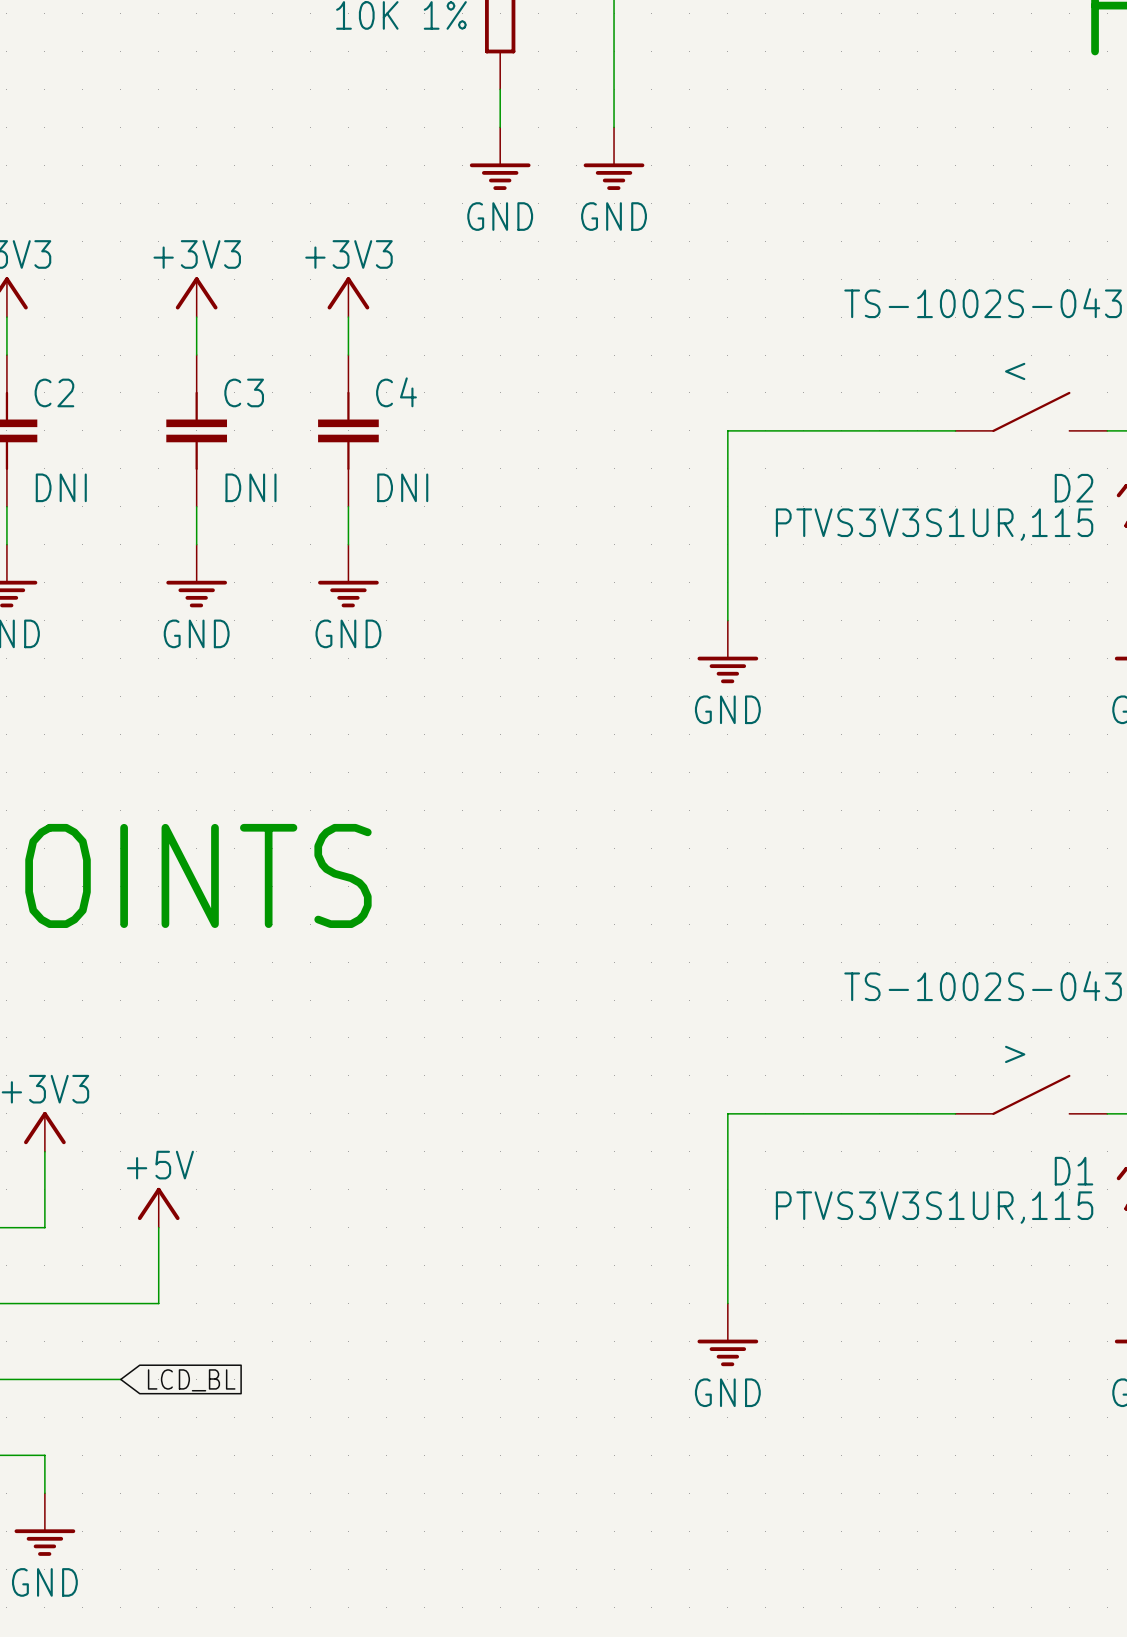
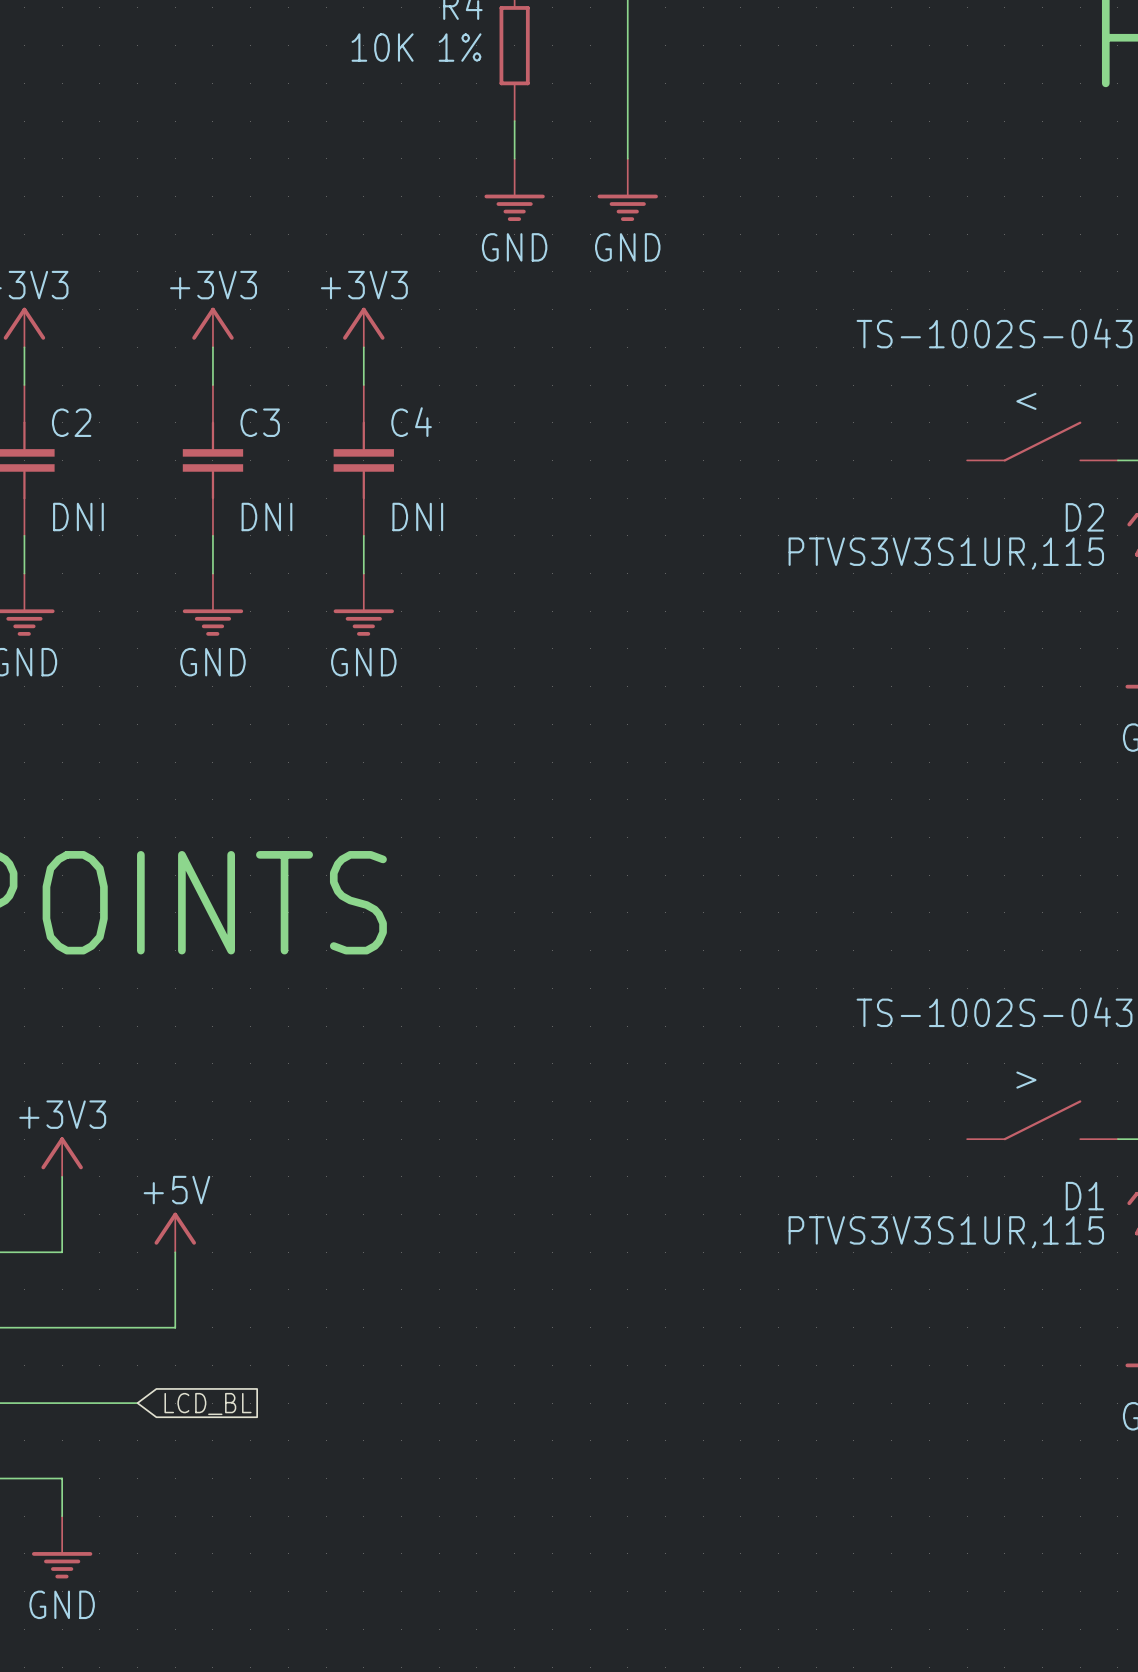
wire: (955, 430) (727, 430) (727, 620) -> none
power symbol: GND (727, 651) -> none
wire: (955, 1113) (727, 1113) (727, 1303) -> none
power symbol: GND (727, 1334) -> none

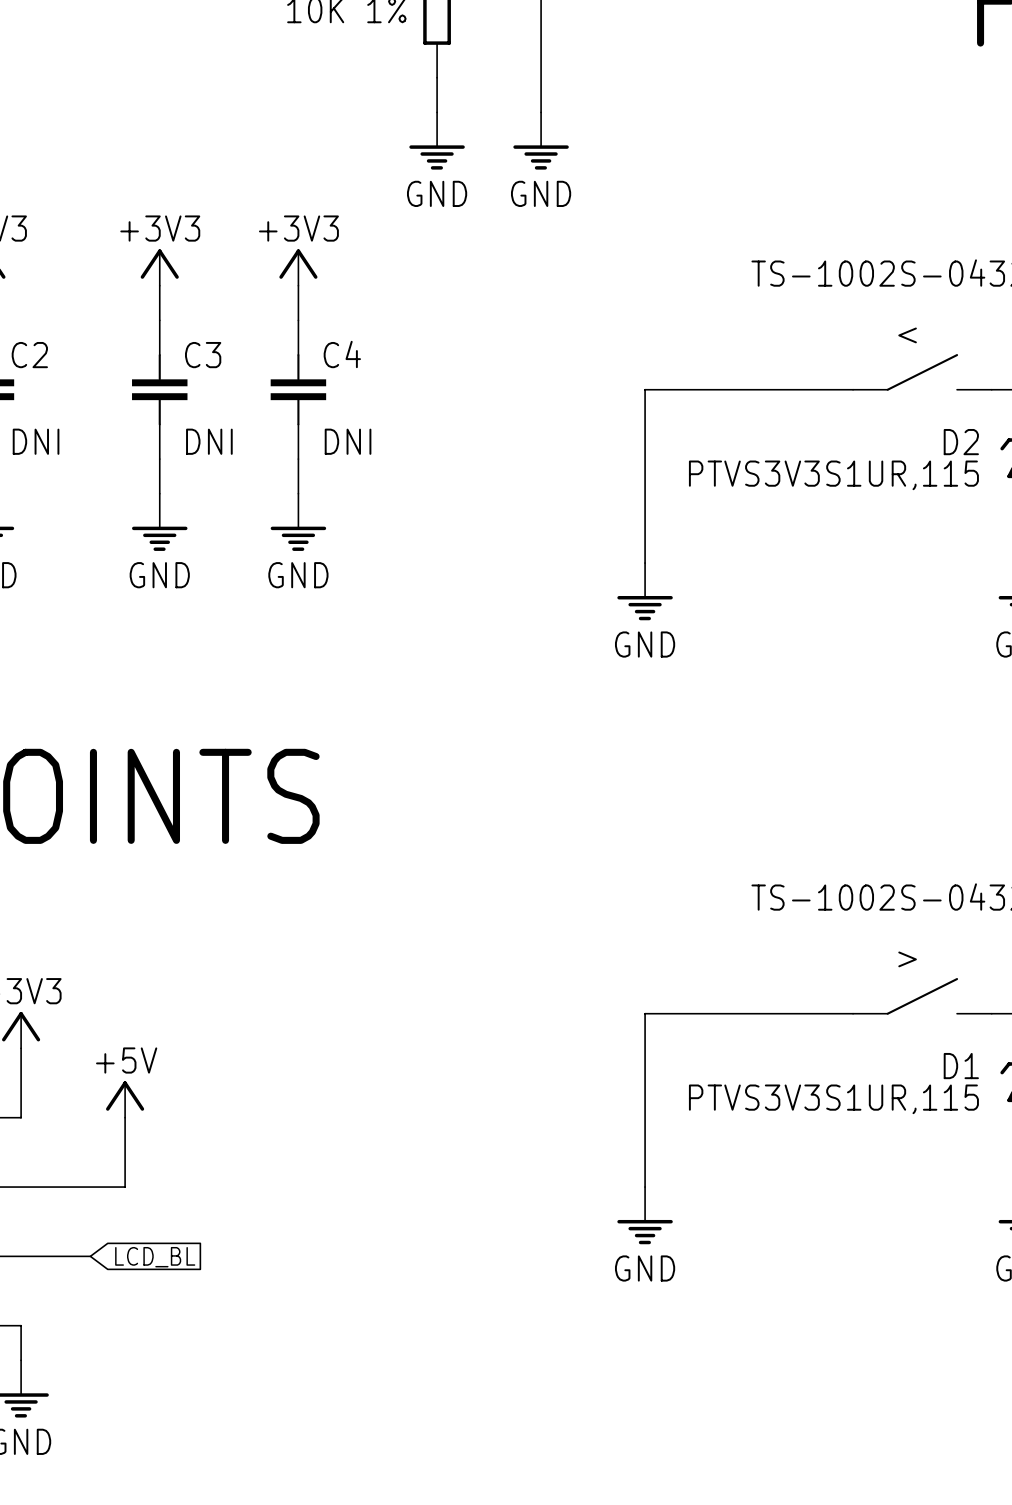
wire: none -> (853, 389) (645, 389) (645, 563)
power symbol: none -> GND (645, 591)
wire: none -> (853, 1013) (645, 1013) (645, 1187)
power symbol: none -> GND (645, 1215)

